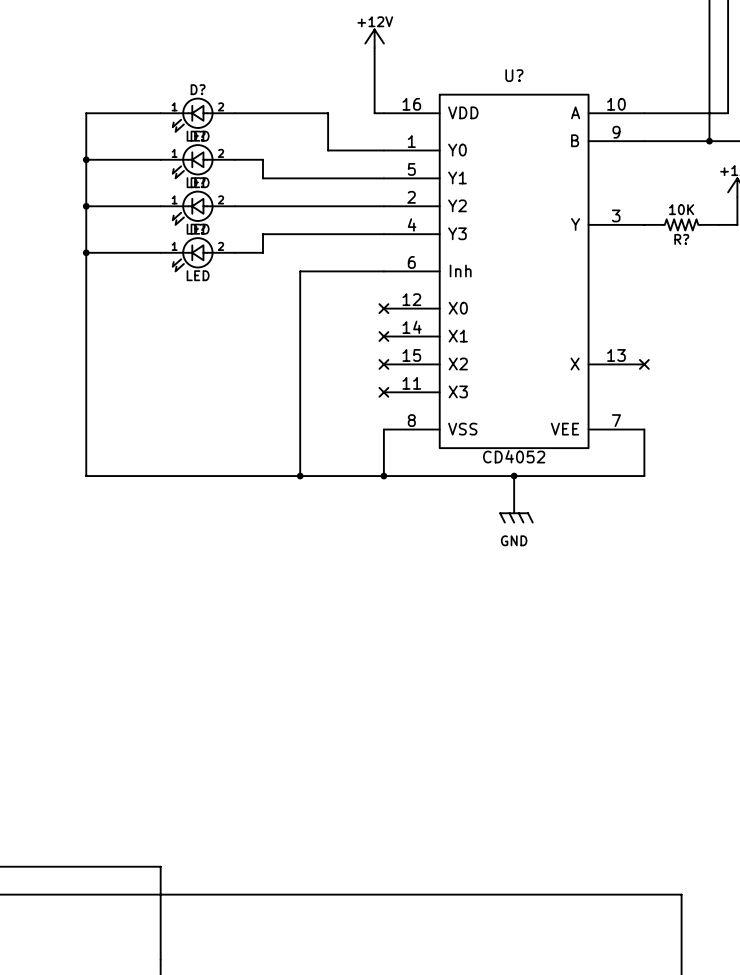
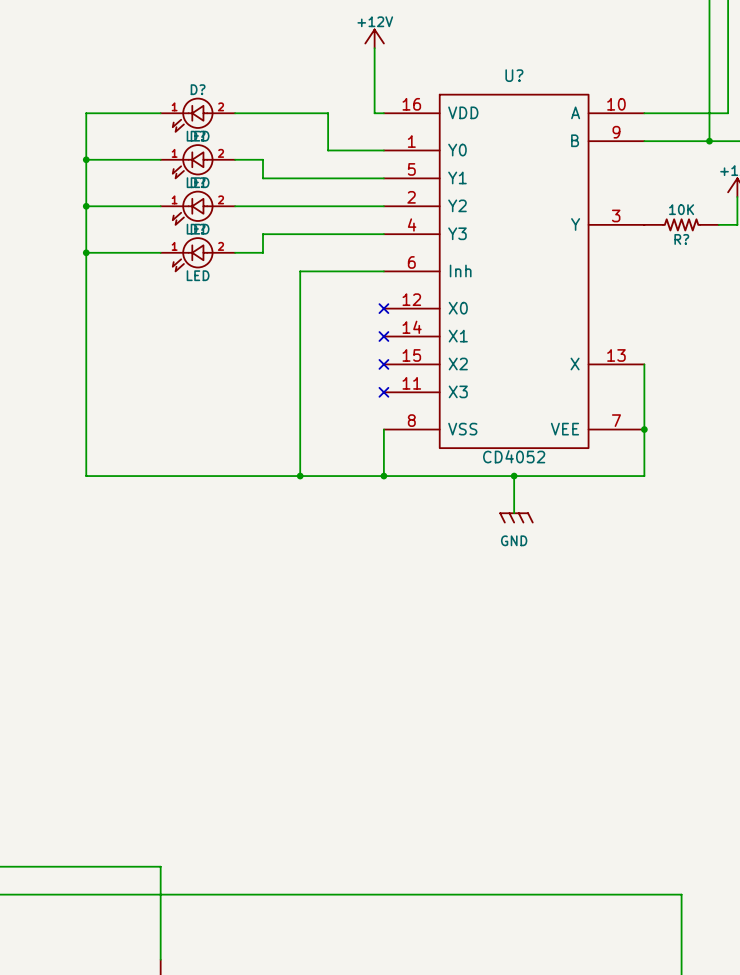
wire: none -> (644, 364) (644, 429)
no-connect mark: (644, 364) -> none
junction: none -> (644, 429)

